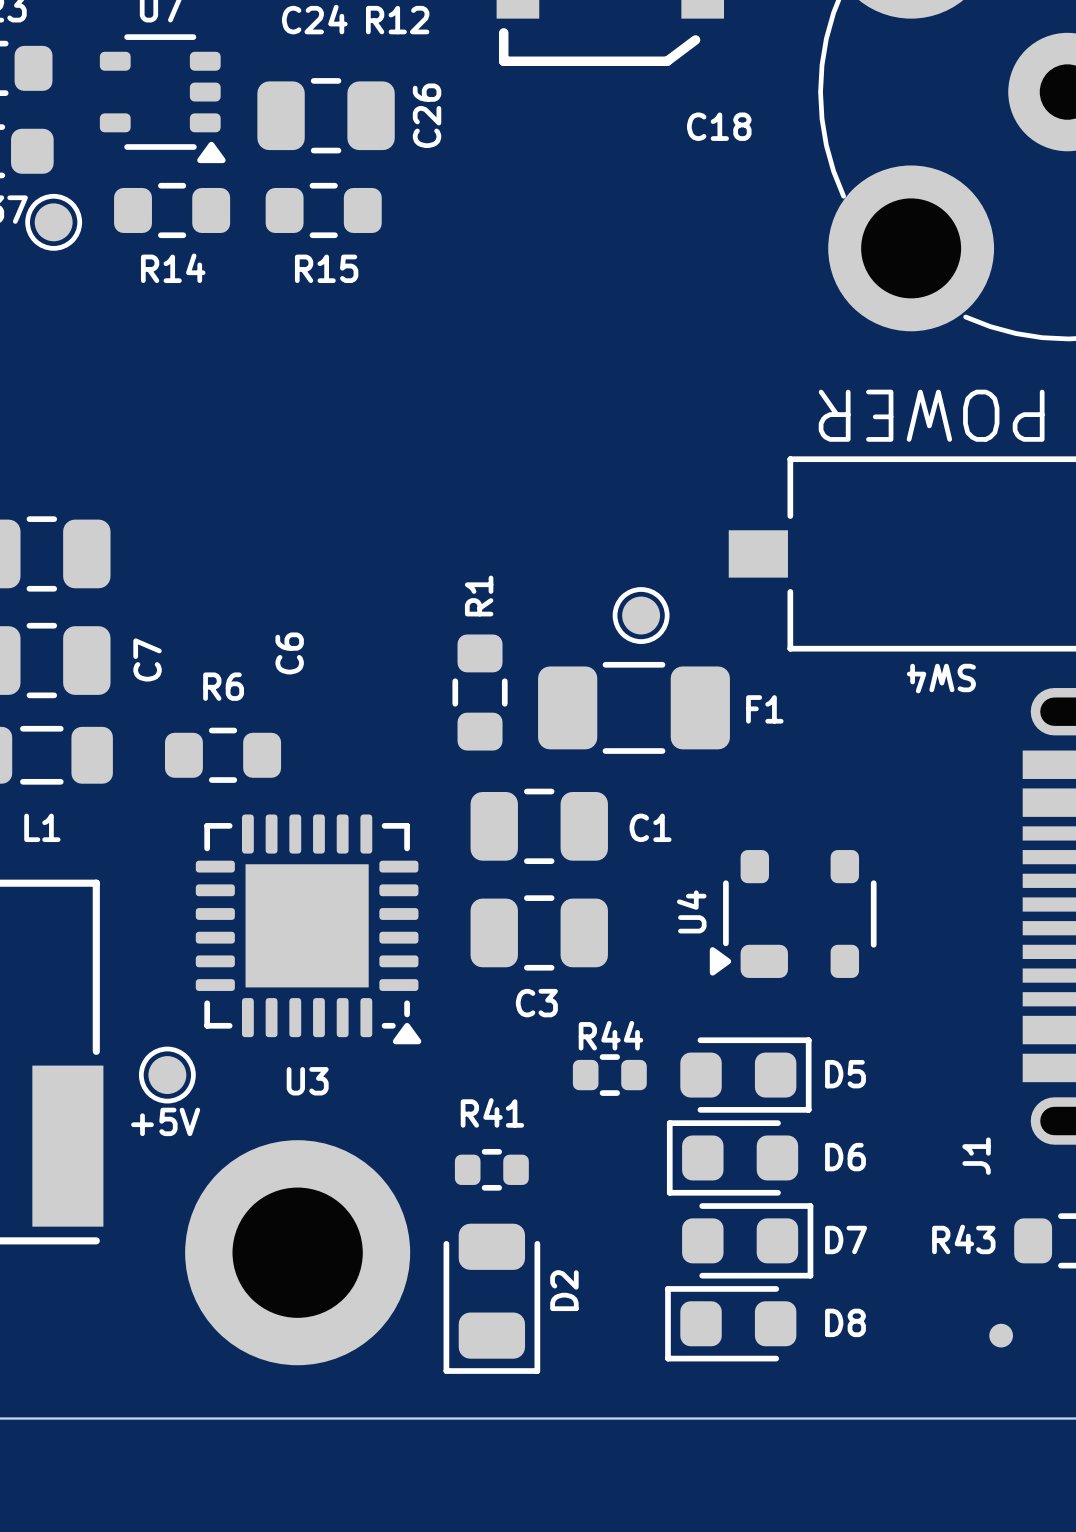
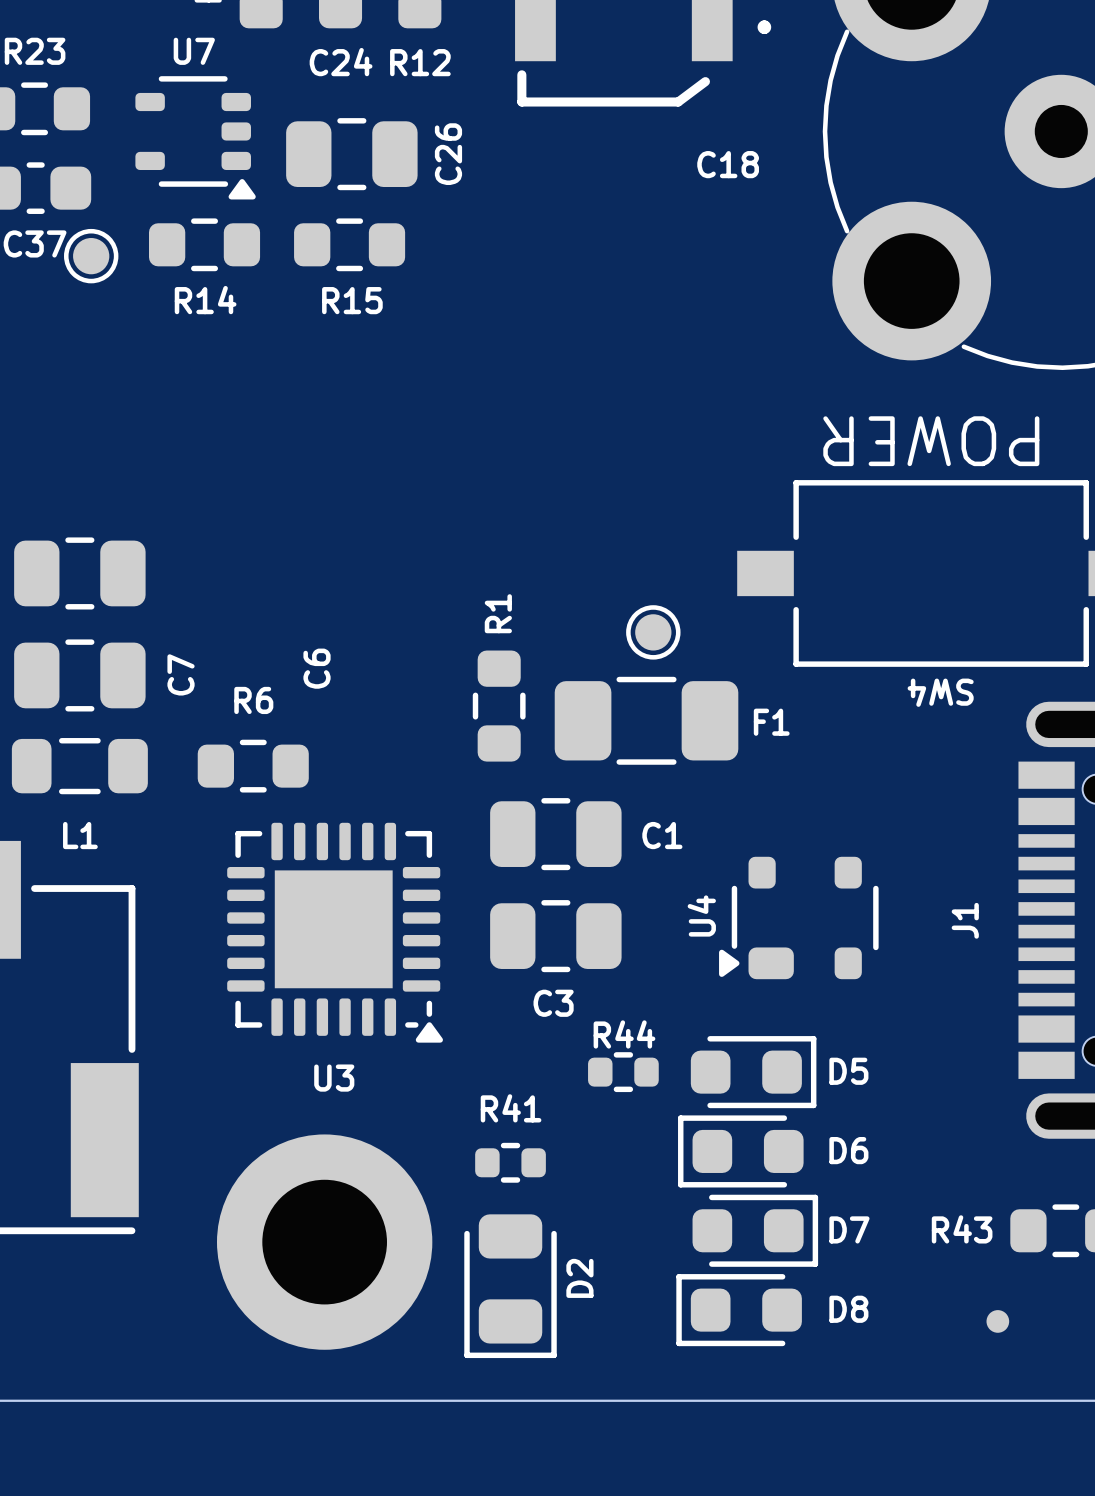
part: (167, 1075) -> none
text: +5V (165, 1121) -> none
J1 name position: J1 (976, 1156) -> J1 (965, 920)

